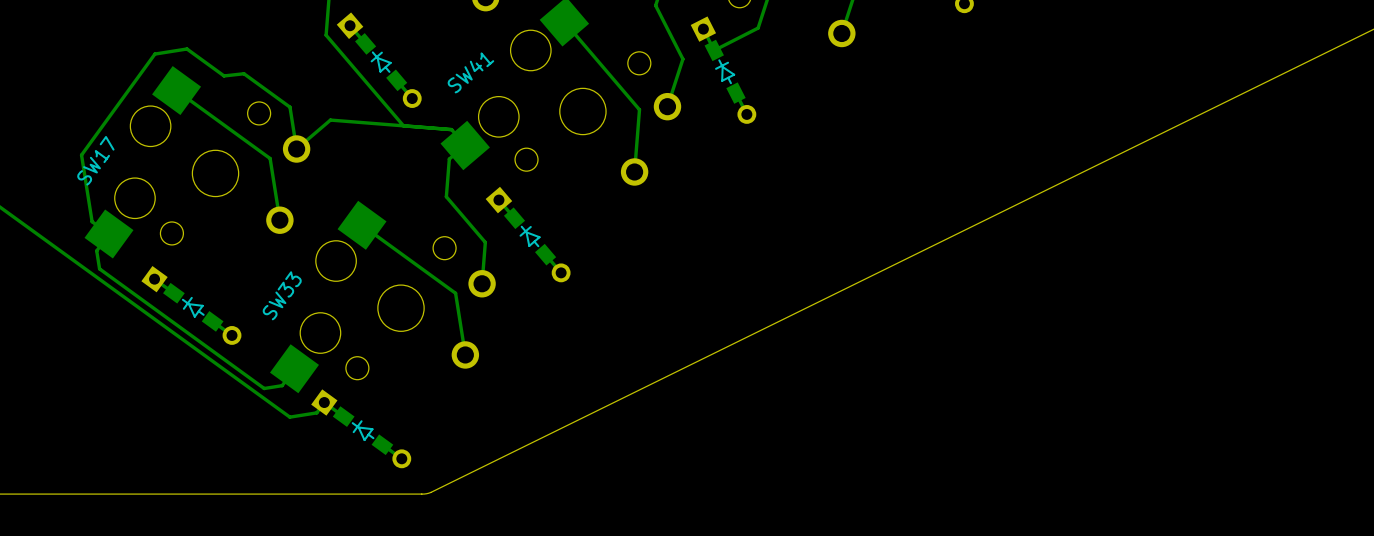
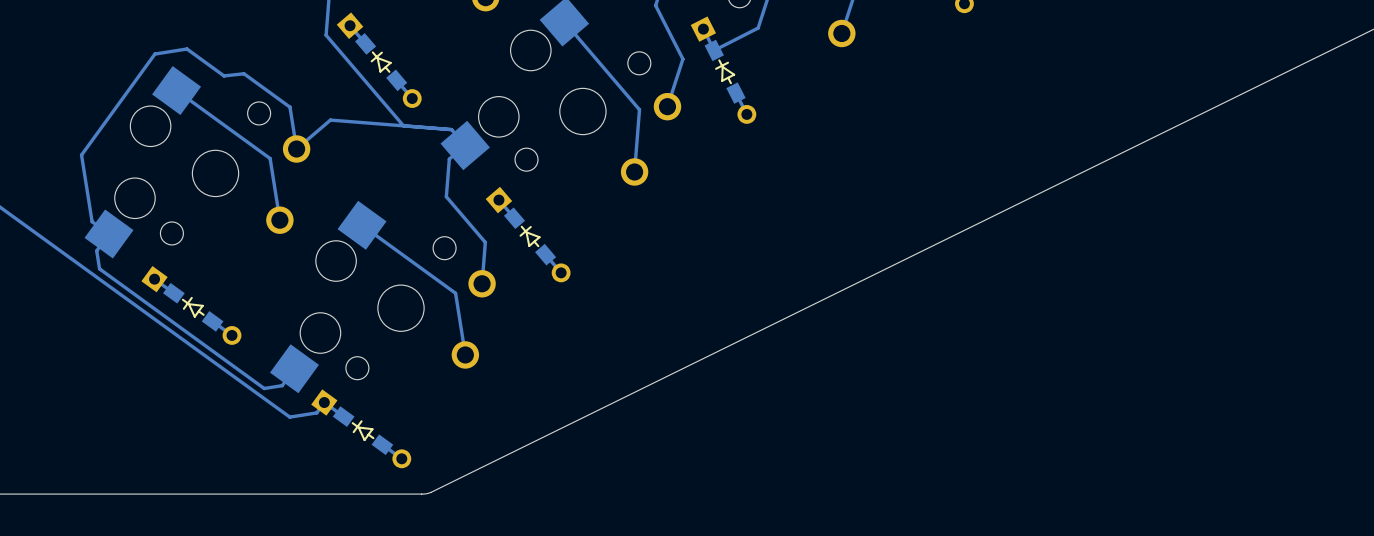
SW41 name: SW41 (470, 72) -> none
SW17 name: SW17 (95, 160) -> none
SW33 name: SW33 (282, 295) -> none

